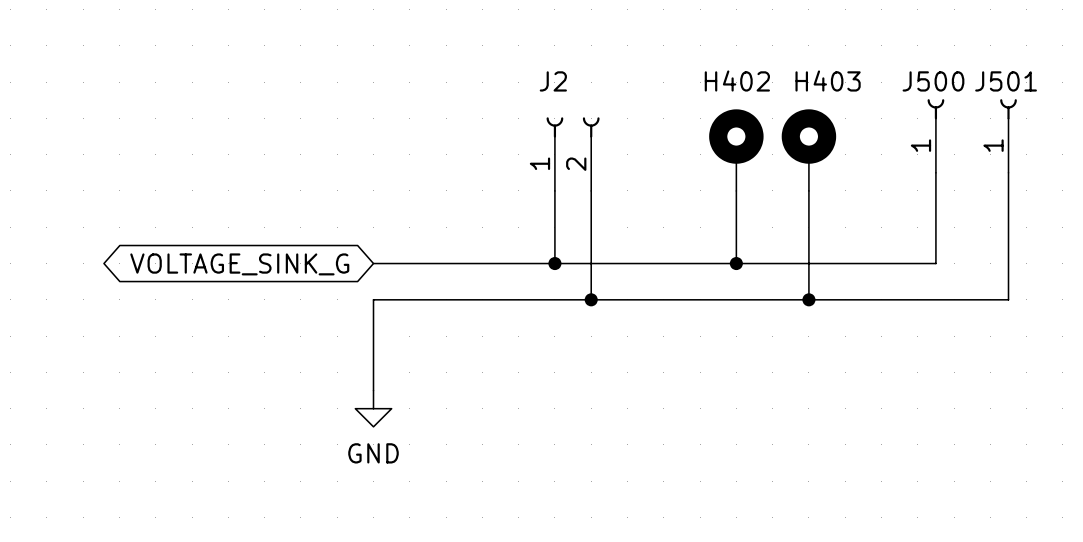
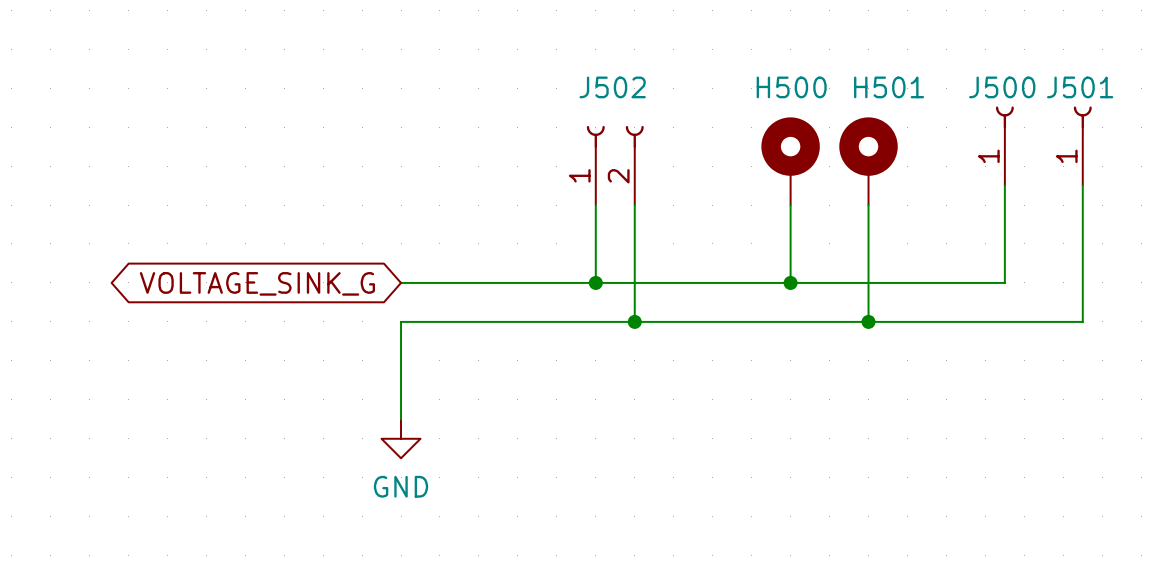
J2 name: J2 (553, 81) -> J502 (612, 87)
H402 name: H402 (737, 81) -> H500 (791, 87)
H403 name: H403 (828, 81) -> H501 (889, 87)

